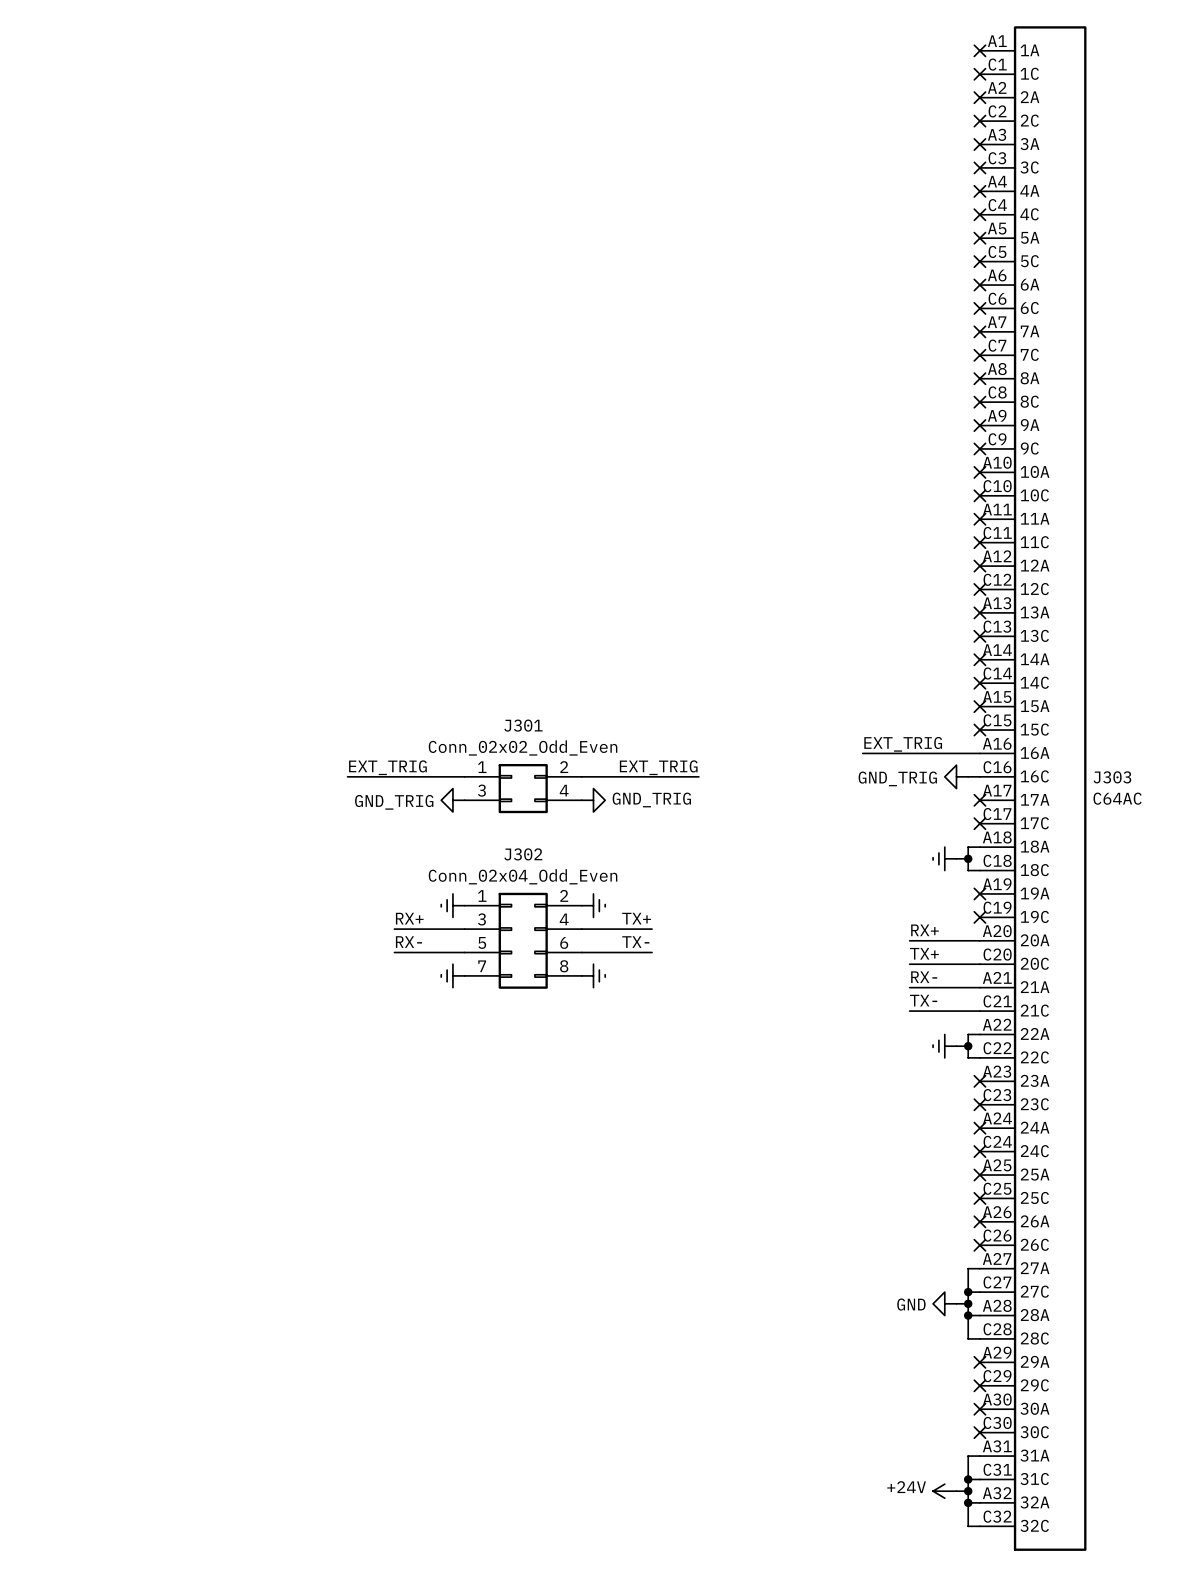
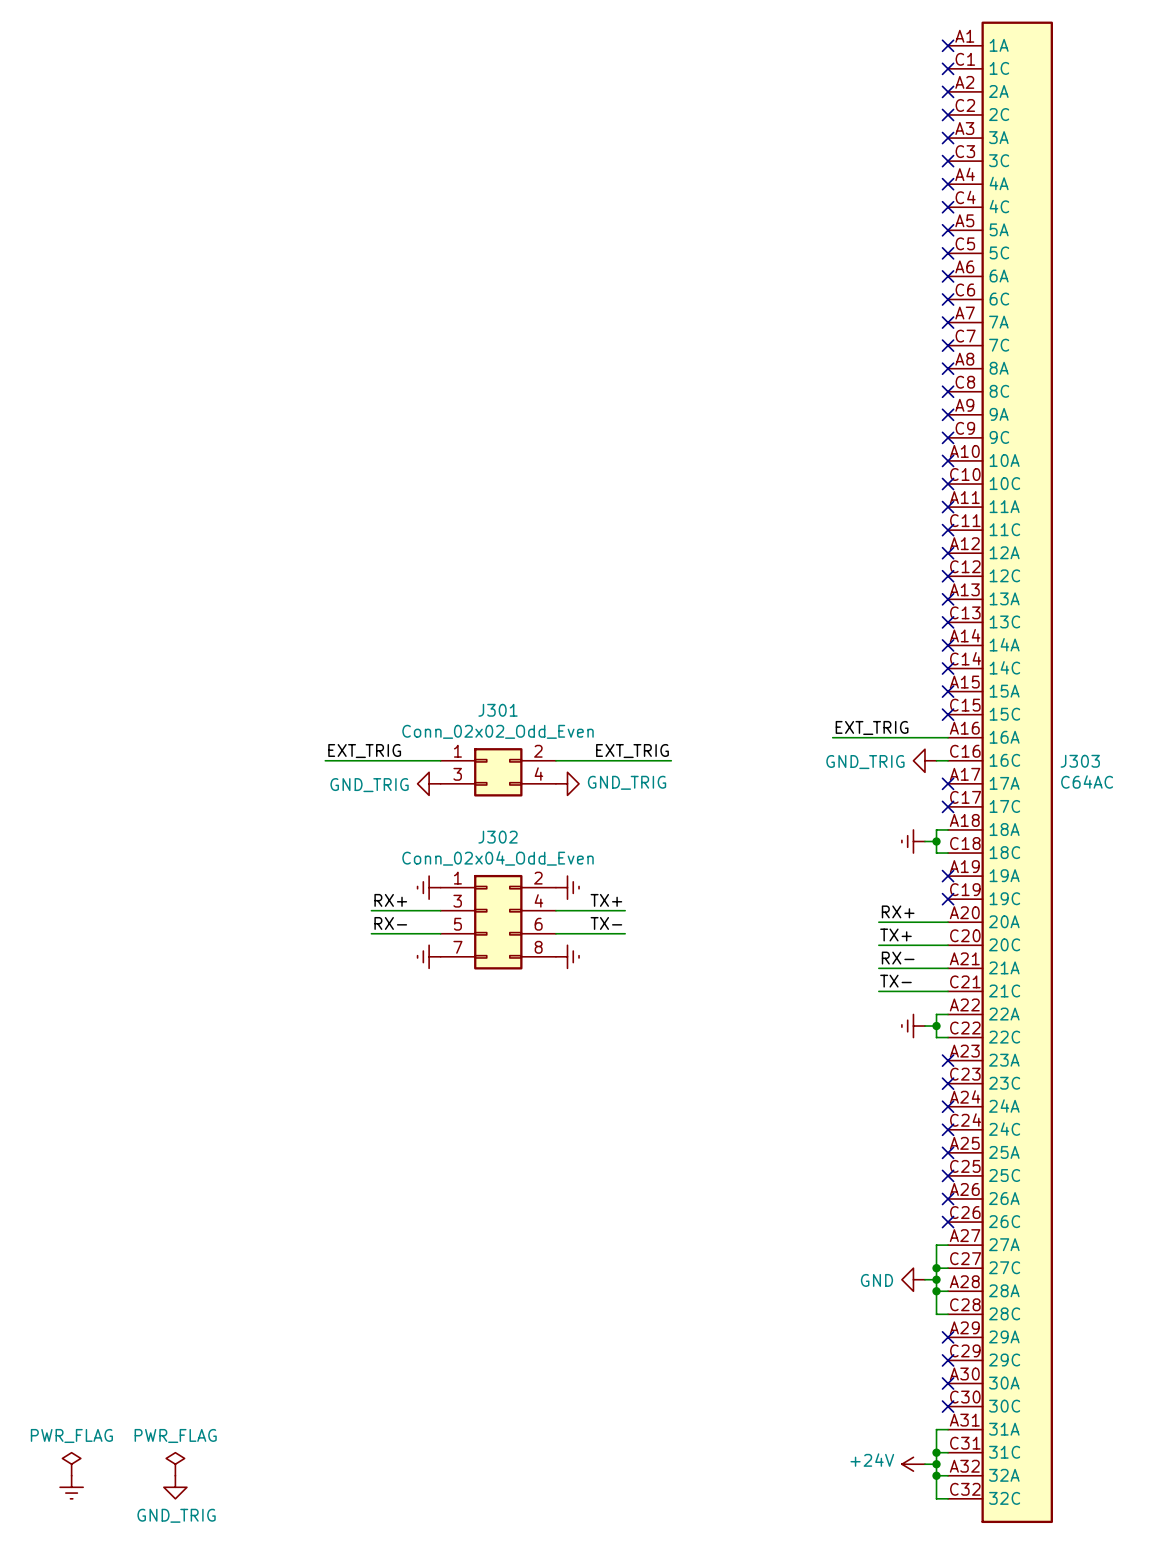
power symbol: none -> PWR_FLAG (71, 1464)
power symbol: none -> PWR_FLAG (175, 1464)
power symbol: none -> (71, 1487)
power symbol: none -> GND_TRIG (175, 1487)

